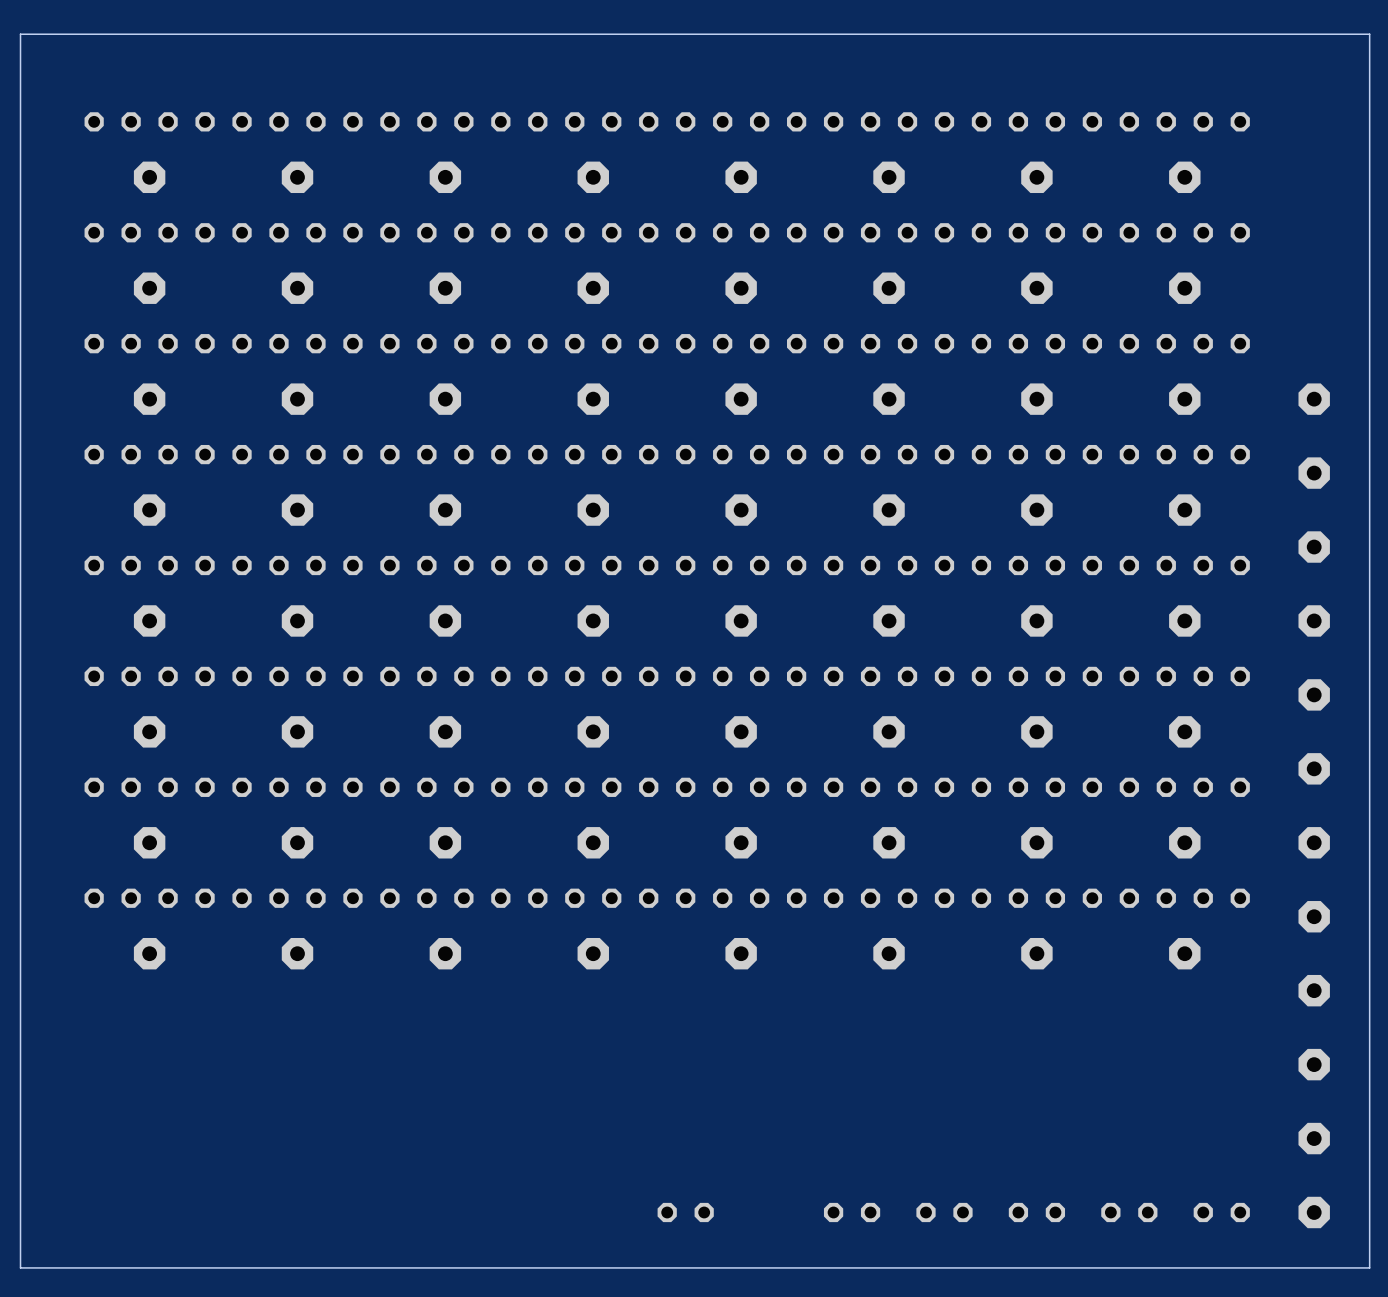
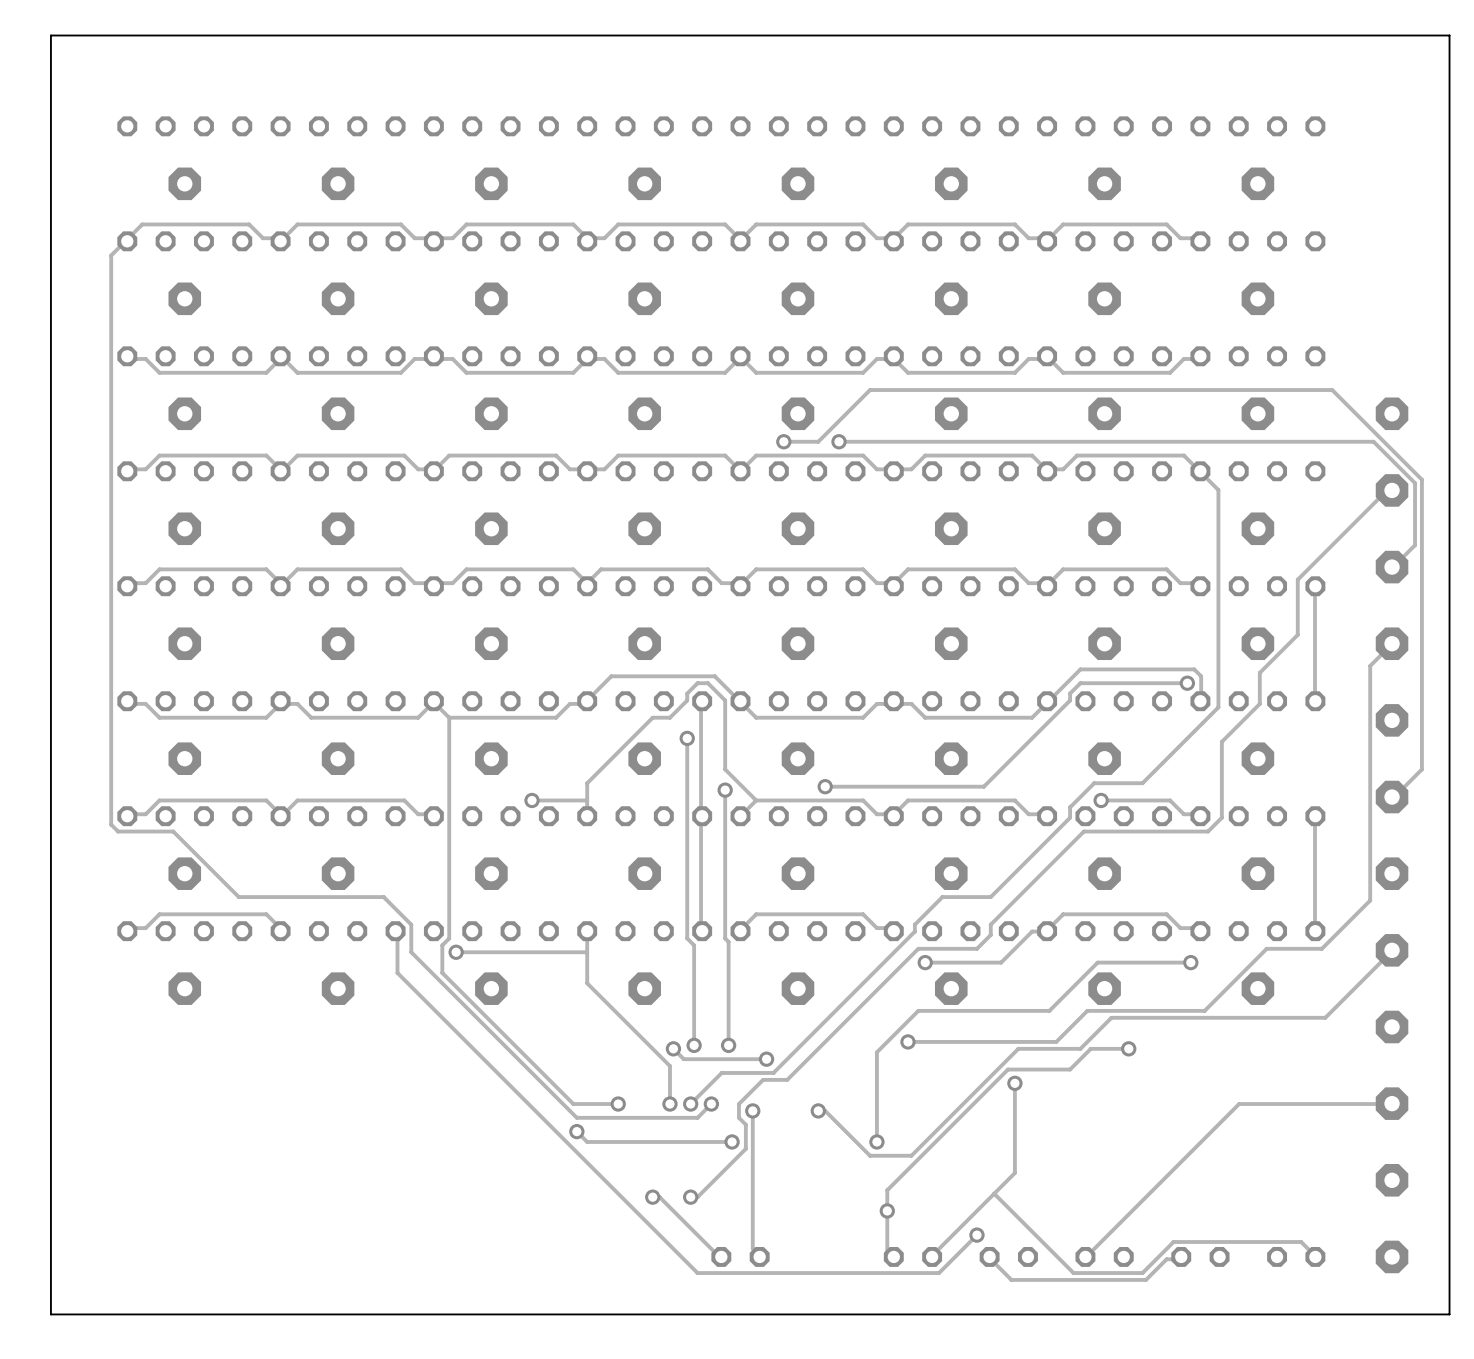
track: none -> (587, 238) (604, 238) (618, 224) (725, 224) (740, 241) (756, 224) (863, 224) (876, 238) (890, 238) (893, 241) (894, 238) (907, 224) (1014, 224) (1028, 238) (1045, 238) (1047, 241) (1063, 224) (1166, 224) (1180, 238) (1197, 238) (1200, 241)
track: none -> (587, 238) (573, 224) (466, 224) (452, 238) (435, 238) (433, 241) (431, 238) (414, 238) (400, 224) (297, 224) (280, 241) (280, 238) (262, 238) (249, 224) (142, 224) (111, 255) (111, 824) (118, 831) (173, 831) (238, 897) (383, 897) (411, 924) (411, 952) (576, 1117) (697, 1117) (711, 1104)
track: none -> (127, 356) (128, 358) (145, 358) (159, 372) (266, 372) (280, 356) (297, 372) (400, 372) (414, 358) (431, 358) (433, 356) (435, 358) (452, 358) (466, 372) (573, 372) (587, 358)
track: none -> (1200, 356) (1197, 358) (1183, 358) (1170, 372) (1063, 372) (1047, 356) (1045, 358) (1028, 358) (1014, 372) (907, 372) (893, 356) (890, 358) (876, 358) (863, 372) (756, 372) (740, 356) (725, 372) (618, 372) (604, 358) (587, 358)
track: none -> (783, 441) (818, 441) (870, 390) (1332, 390) (1421, 479) (1421, 769) (1394, 797) (1392, 797)
via: none -> (783, 441)
track: none -> (839, 441) (1373, 441) (1415, 483) (1415, 545) (1392, 567)
via: none -> (839, 441)
track: none -> (127, 471) (128, 469) (145, 469) (159, 455) (266, 455) (280, 471) (297, 455) (404, 455) (418, 469) (431, 469) (433, 471) (449, 455) (556, 455) (569, 469) (604, 469) (618, 455) (725, 455) (740, 471) (756, 455) (863, 455) (876, 469) (890, 469) (893, 471) (894, 469) (911, 469) (925, 455) (1032, 455) (1047, 471) (1049, 469) (1063, 469) (1077, 455) (1183, 455) (1218, 490) (1218, 707) (1142, 783) (1094, 783) (1070, 807) (1070, 817) (990, 897) (942, 897) (914, 924) (914, 931) (773, 1072) (721, 1072) (690, 1104)
track: none -> (1392, 490) (1390, 493) (1383, 493) (1297, 579) (1297, 634) (1259, 672) (1259, 703) (1221, 741) (1221, 817) (1208, 831) (1083, 831) (990, 924) (990, 935) (976, 948) (918, 948) (787, 1079) (763, 1079) (738, 1104) (738, 1117) (745, 1124) (745, 1148) (697, 1197) (690, 1197)
track: none -> (587, 583) (573, 569) (466, 569) (452, 583) (435, 583) (433, 586) (431, 583) (414, 583) (400, 569) (297, 569) (280, 586) (280, 583) (266, 569) (159, 569) (145, 583) (128, 583) (127, 586)
track: none -> (587, 583) (601, 569) (707, 569) (721, 583) (738, 583) (740, 586) (756, 569) (863, 569) (876, 583) (890, 583) (893, 586) (894, 583) (907, 569) (1014, 569) (1028, 583) (1045, 583) (1047, 586) (1063, 569) (1166, 569) (1180, 583) (1197, 583) (1200, 586)
track: none -> (1315, 586) (1315, 701)
track: none -> (1392, 643) (1370, 665) (1370, 900) (1321, 948) (1266, 948) (1204, 1010) (1087, 1010) (1056, 1041) (907, 1041)
track: none -> (1187, 683) (1080, 683) (1070, 693) (1070, 700) (983, 786) (825, 786)
via: none -> (1187, 683)
track: none -> (127, 701) (128, 703) (145, 703) (159, 717) (266, 717) (280, 701) (283, 703) (297, 703) (311, 717) (418, 717) (433, 701) (449, 717)
track: none -> (702, 701) (702, 931)
track: none -> (1200, 701) (1201, 676) (1194, 669) (1080, 669) (1032, 717) (925, 717) (911, 703) (894, 703) (893, 701) (890, 703) (876, 703) (863, 717) (756, 717) (714, 676) (611, 676) (587, 700) (587, 703) (569, 703) (556, 717) (449, 717)
track: none -> (449, 717) (449, 938) (442, 945) (442, 972) (573, 1104) (618, 1104)
track: none -> (687, 738) (687, 938) (694, 945) (694, 1045)
via: none -> (687, 738)
via: none -> (825, 786)
track: none -> (725, 790) (725, 938) (728, 941) (728, 1045)
via: none -> (725, 790)
via: none -> (532, 800)
track: none -> (587, 800) (532, 800)
track: none -> (756, 800) (740, 816)
track: none -> (756, 800) (863, 800) (876, 814) (890, 814) (893, 816) (907, 800) (1014, 800) (1028, 814) (1045, 814) (1047, 816)
track: none -> (756, 800) (725, 769) (725, 700) (707, 683) (697, 683) (687, 693) (687, 700) (669, 717) (652, 717) (587, 783) (587, 816)
track: none -> (1101, 800) (1170, 800) (1183, 814) (1197, 814) (1200, 816)
via: none -> (1101, 800)
track: none -> (433, 816) (431, 814) (418, 814) (404, 800) (297, 800) (280, 816) (266, 800) (159, 800) (145, 814) (128, 814) (127, 816)
track: none -> (1315, 816) (1315, 931)
track: none -> (280, 931) (280, 928) (266, 914) (159, 914) (145, 928) (128, 928) (127, 931)
track: none -> (395, 931) (397, 931) (397, 972) (697, 1273) (939, 1273) (976, 1235)
track: none -> (587, 931) (587, 983) (669, 1066) (669, 1104)
track: none -> (893, 931) (890, 928) (876, 928) (863, 914) (756, 914) (740, 931)
track: none -> (1200, 931) (1197, 928) (1180, 928) (1166, 914) (1063, 914) (1047, 931) (1032, 931) (1001, 962) (925, 962)
track: none -> (1392, 950) (1325, 1017) (1111, 1017) (1080, 1048) (1018, 1048) (911, 1155) (870, 1155) (825, 1110) (818, 1110)
via: none -> (456, 952)
track: none -> (587, 952) (456, 952)
via: none -> (925, 962)
track: none -> (1190, 962) (1097, 962) (1049, 1010) (918, 1010) (876, 1052) (876, 1141)
via: none -> (1190, 962)
via: none -> (907, 1041)
via: none -> (694, 1045)
via: none -> (728, 1045)
track: none -> (673, 1048) (683, 1059) (766, 1059)
via: none -> (673, 1048)
track: none -> (1128, 1048) (1090, 1048) (1070, 1069) (1008, 1069) (887, 1190) (887, 1252) (893, 1256)
via: none -> (1128, 1048)
via: none -> (766, 1059)
track: none -> (1014, 1083) (1014, 1173) (932, 1256)
via: none -> (1014, 1083)
via: none -> (618, 1104)
via: none -> (669, 1104)
via: none -> (690, 1104)
via: none -> (711, 1104)
track: none -> (1392, 1103) (1239, 1104) (1085, 1256)
track: none -> (752, 1110) (752, 1248) (759, 1256)
via: none -> (752, 1110)
via: none -> (818, 1110)
track: none -> (576, 1131) (587, 1141) (732, 1141)
via: none -> (576, 1131)
via: none -> (732, 1141)
via: none -> (876, 1141)
track: none -> (994, 1193) (1073, 1273) (1142, 1273) (1173, 1242) (1301, 1242) (1315, 1256)
track: none -> (652, 1197) (659, 1197) (721, 1256)
via: none -> (652, 1197)
via: none -> (690, 1197)
via: none -> (887, 1210)
via: none -> (976, 1235)
track: none -> (1181, 1256) (1180, 1259) (1166, 1259) (1145, 1279) (1011, 1279) (989, 1256)

